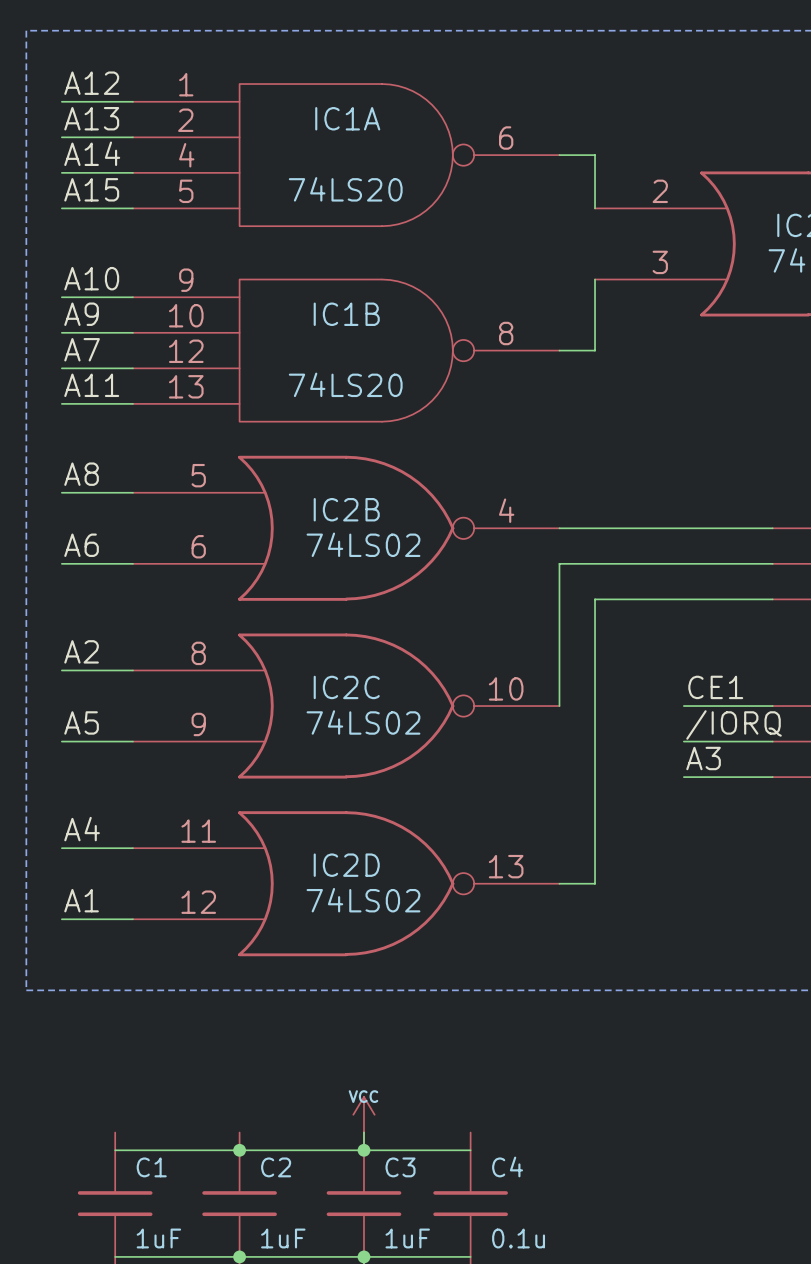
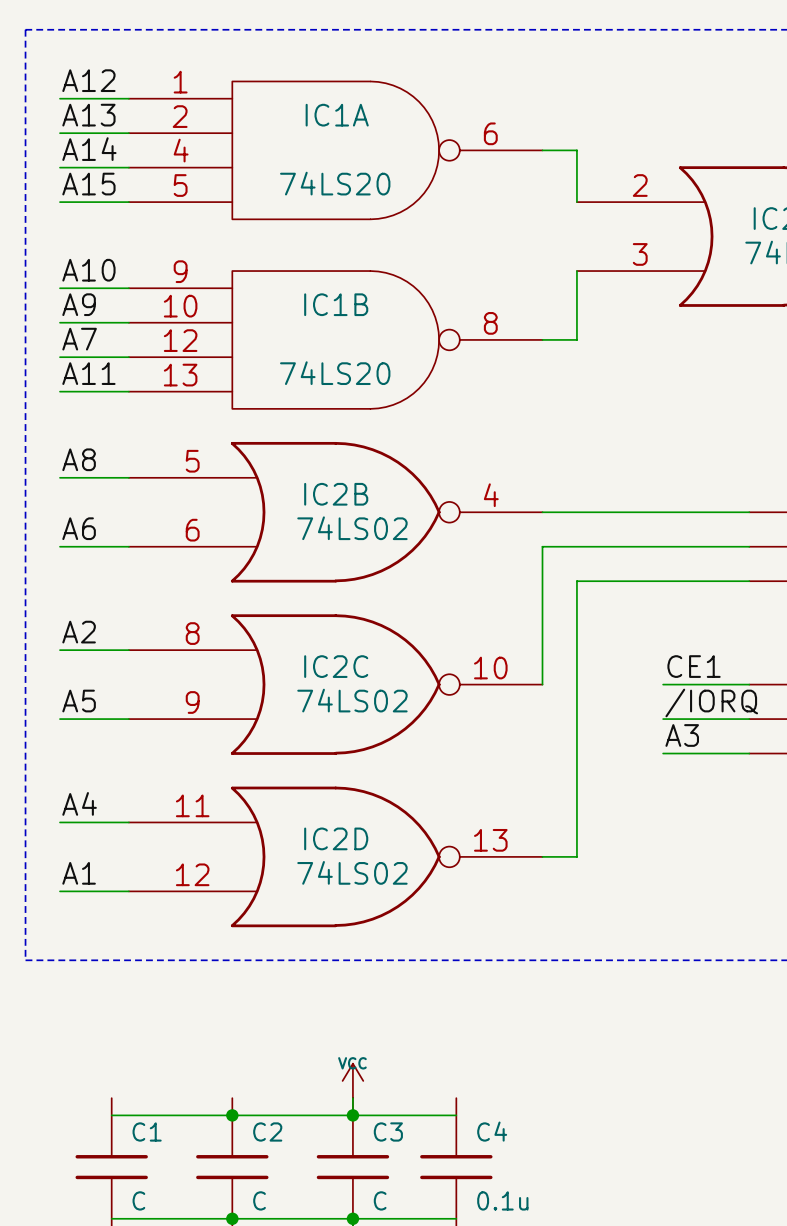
C1 value: 1uF (158, 1238) -> C (138, 1200)
C2 value: 1uF (283, 1238) -> C (259, 1200)
C3 value: 1uF (407, 1238) -> C (380, 1200)

